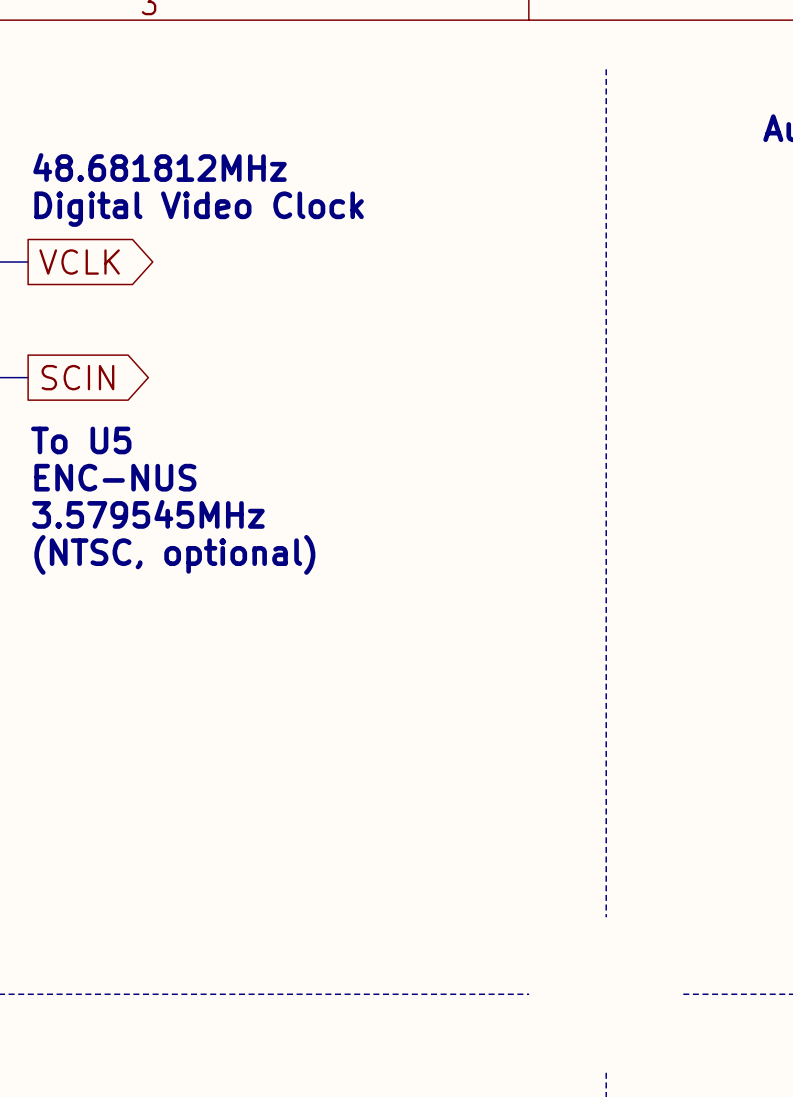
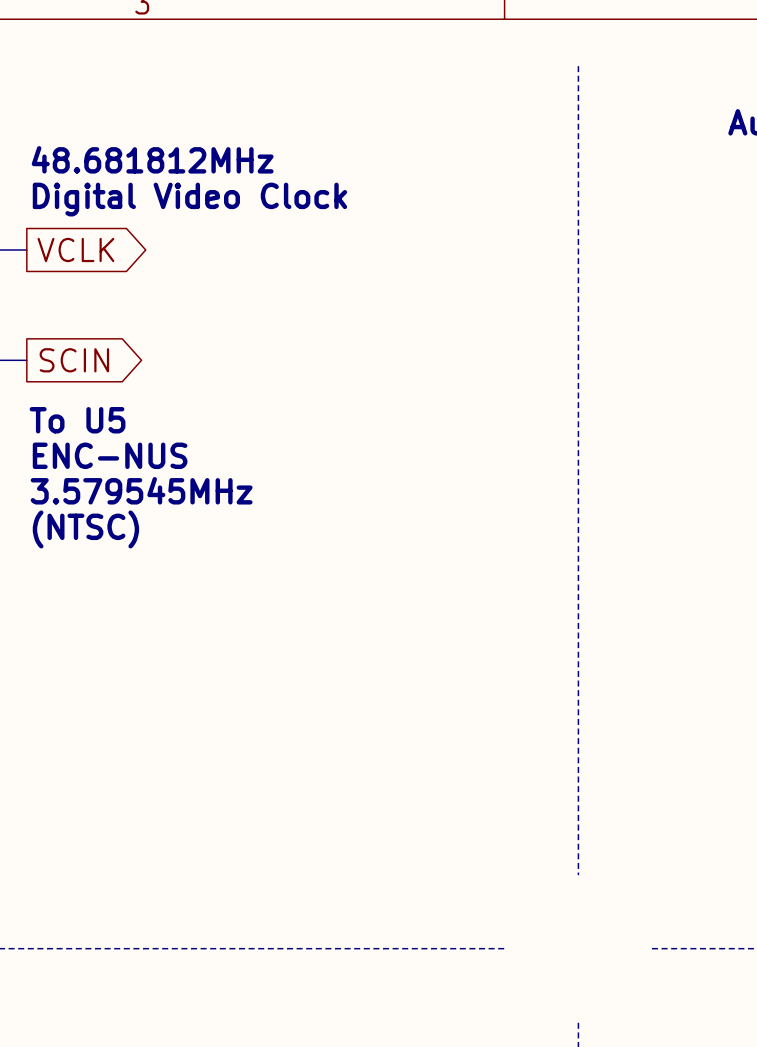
text: (NTSC, optional) (174, 554) -> (NTSC) (85, 529)

